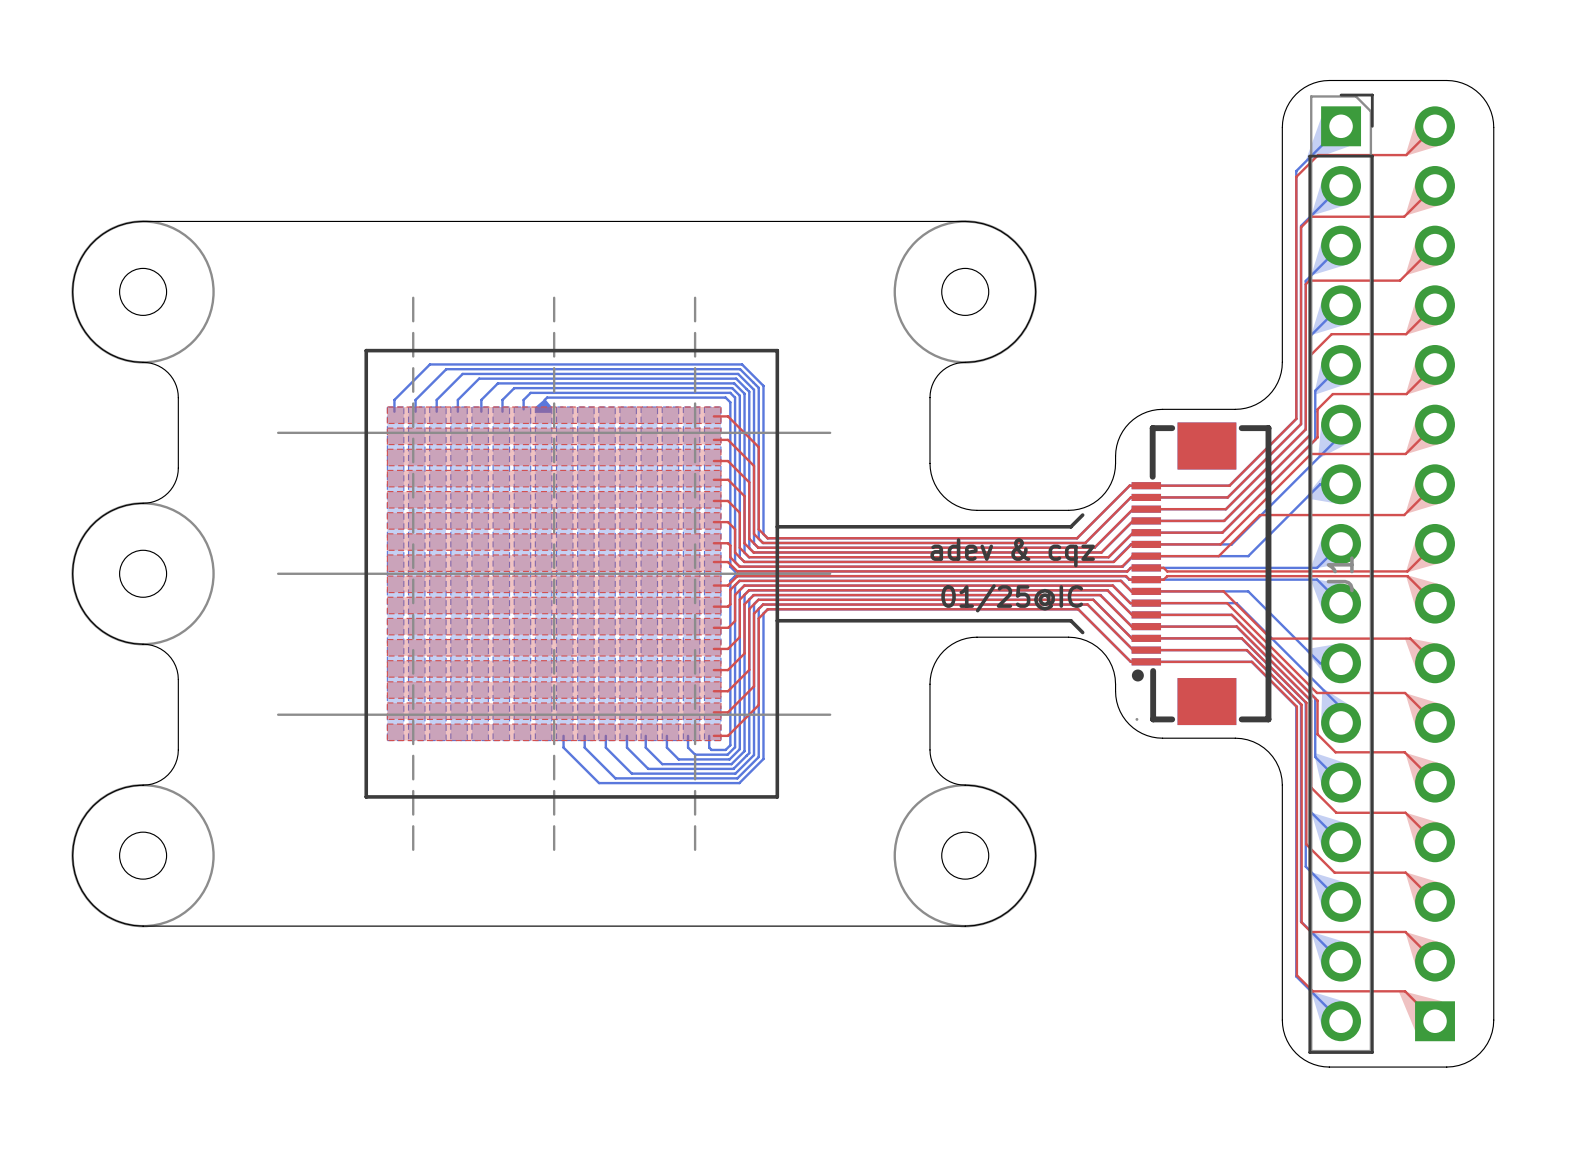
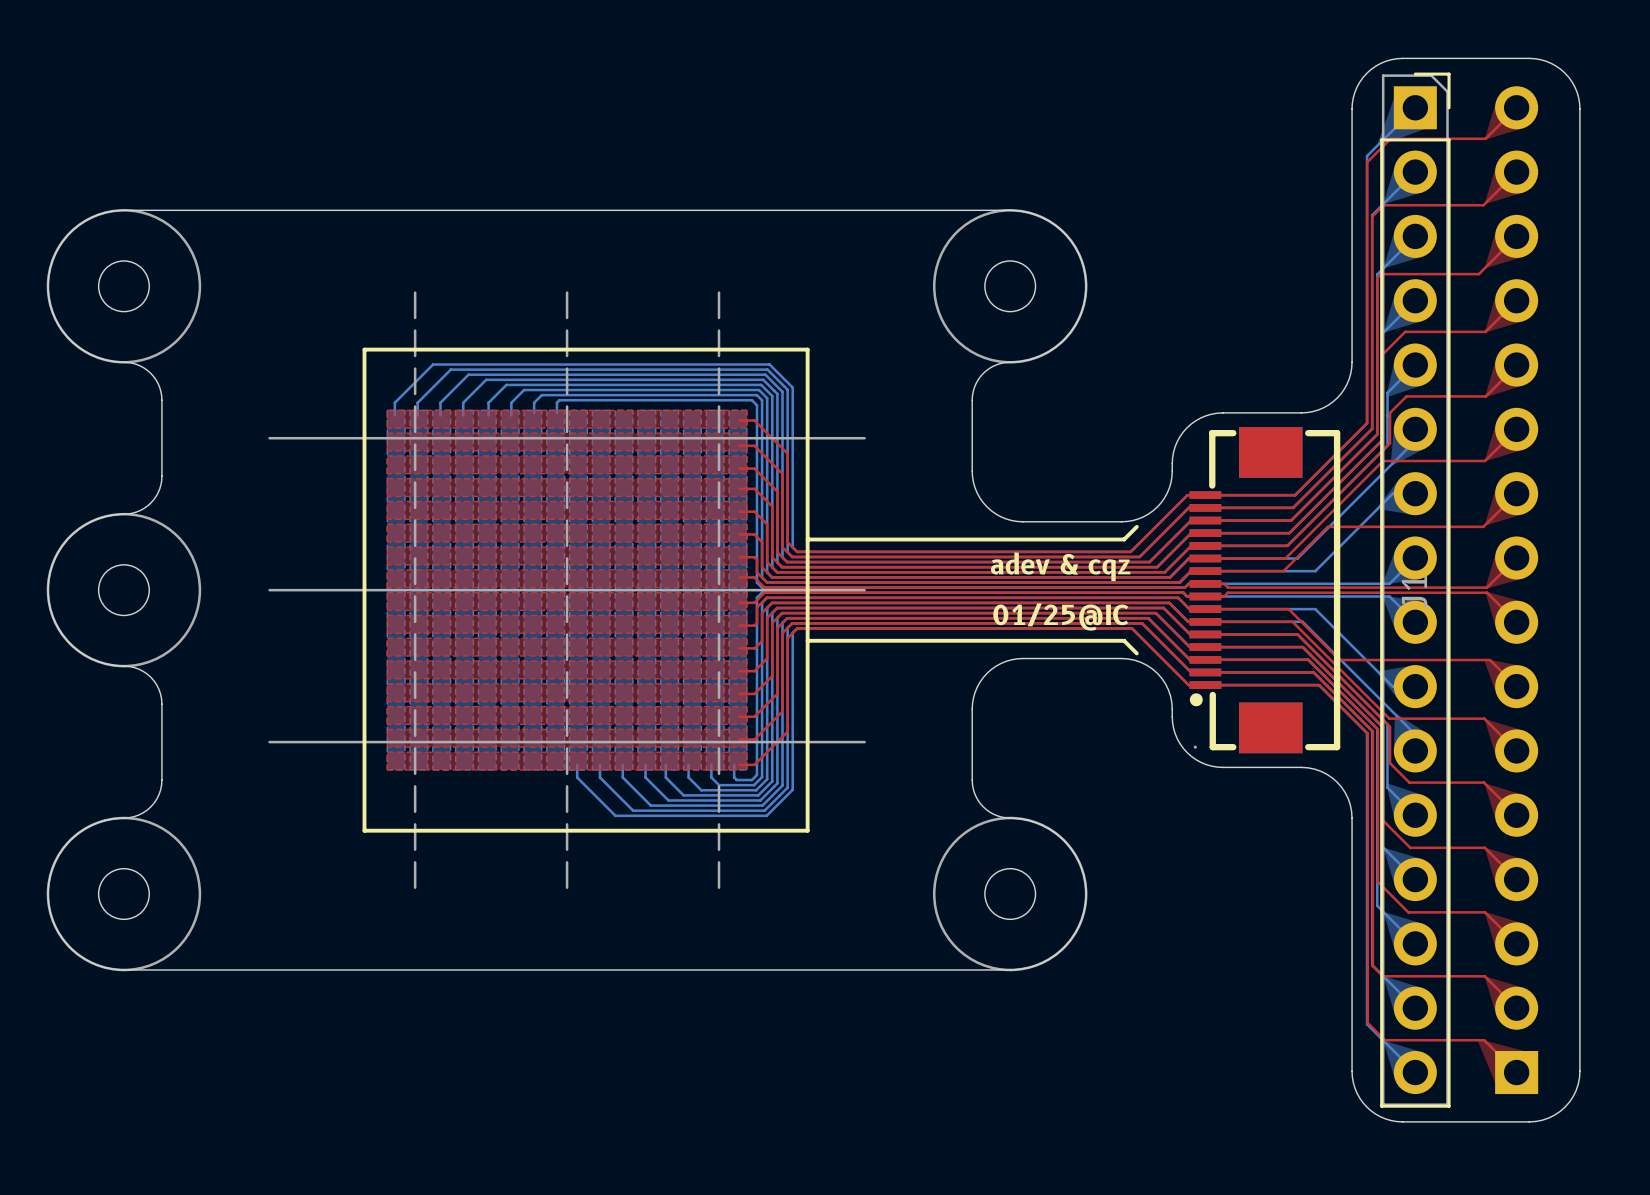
drawing: [535, 399, 552, 413] -> none

